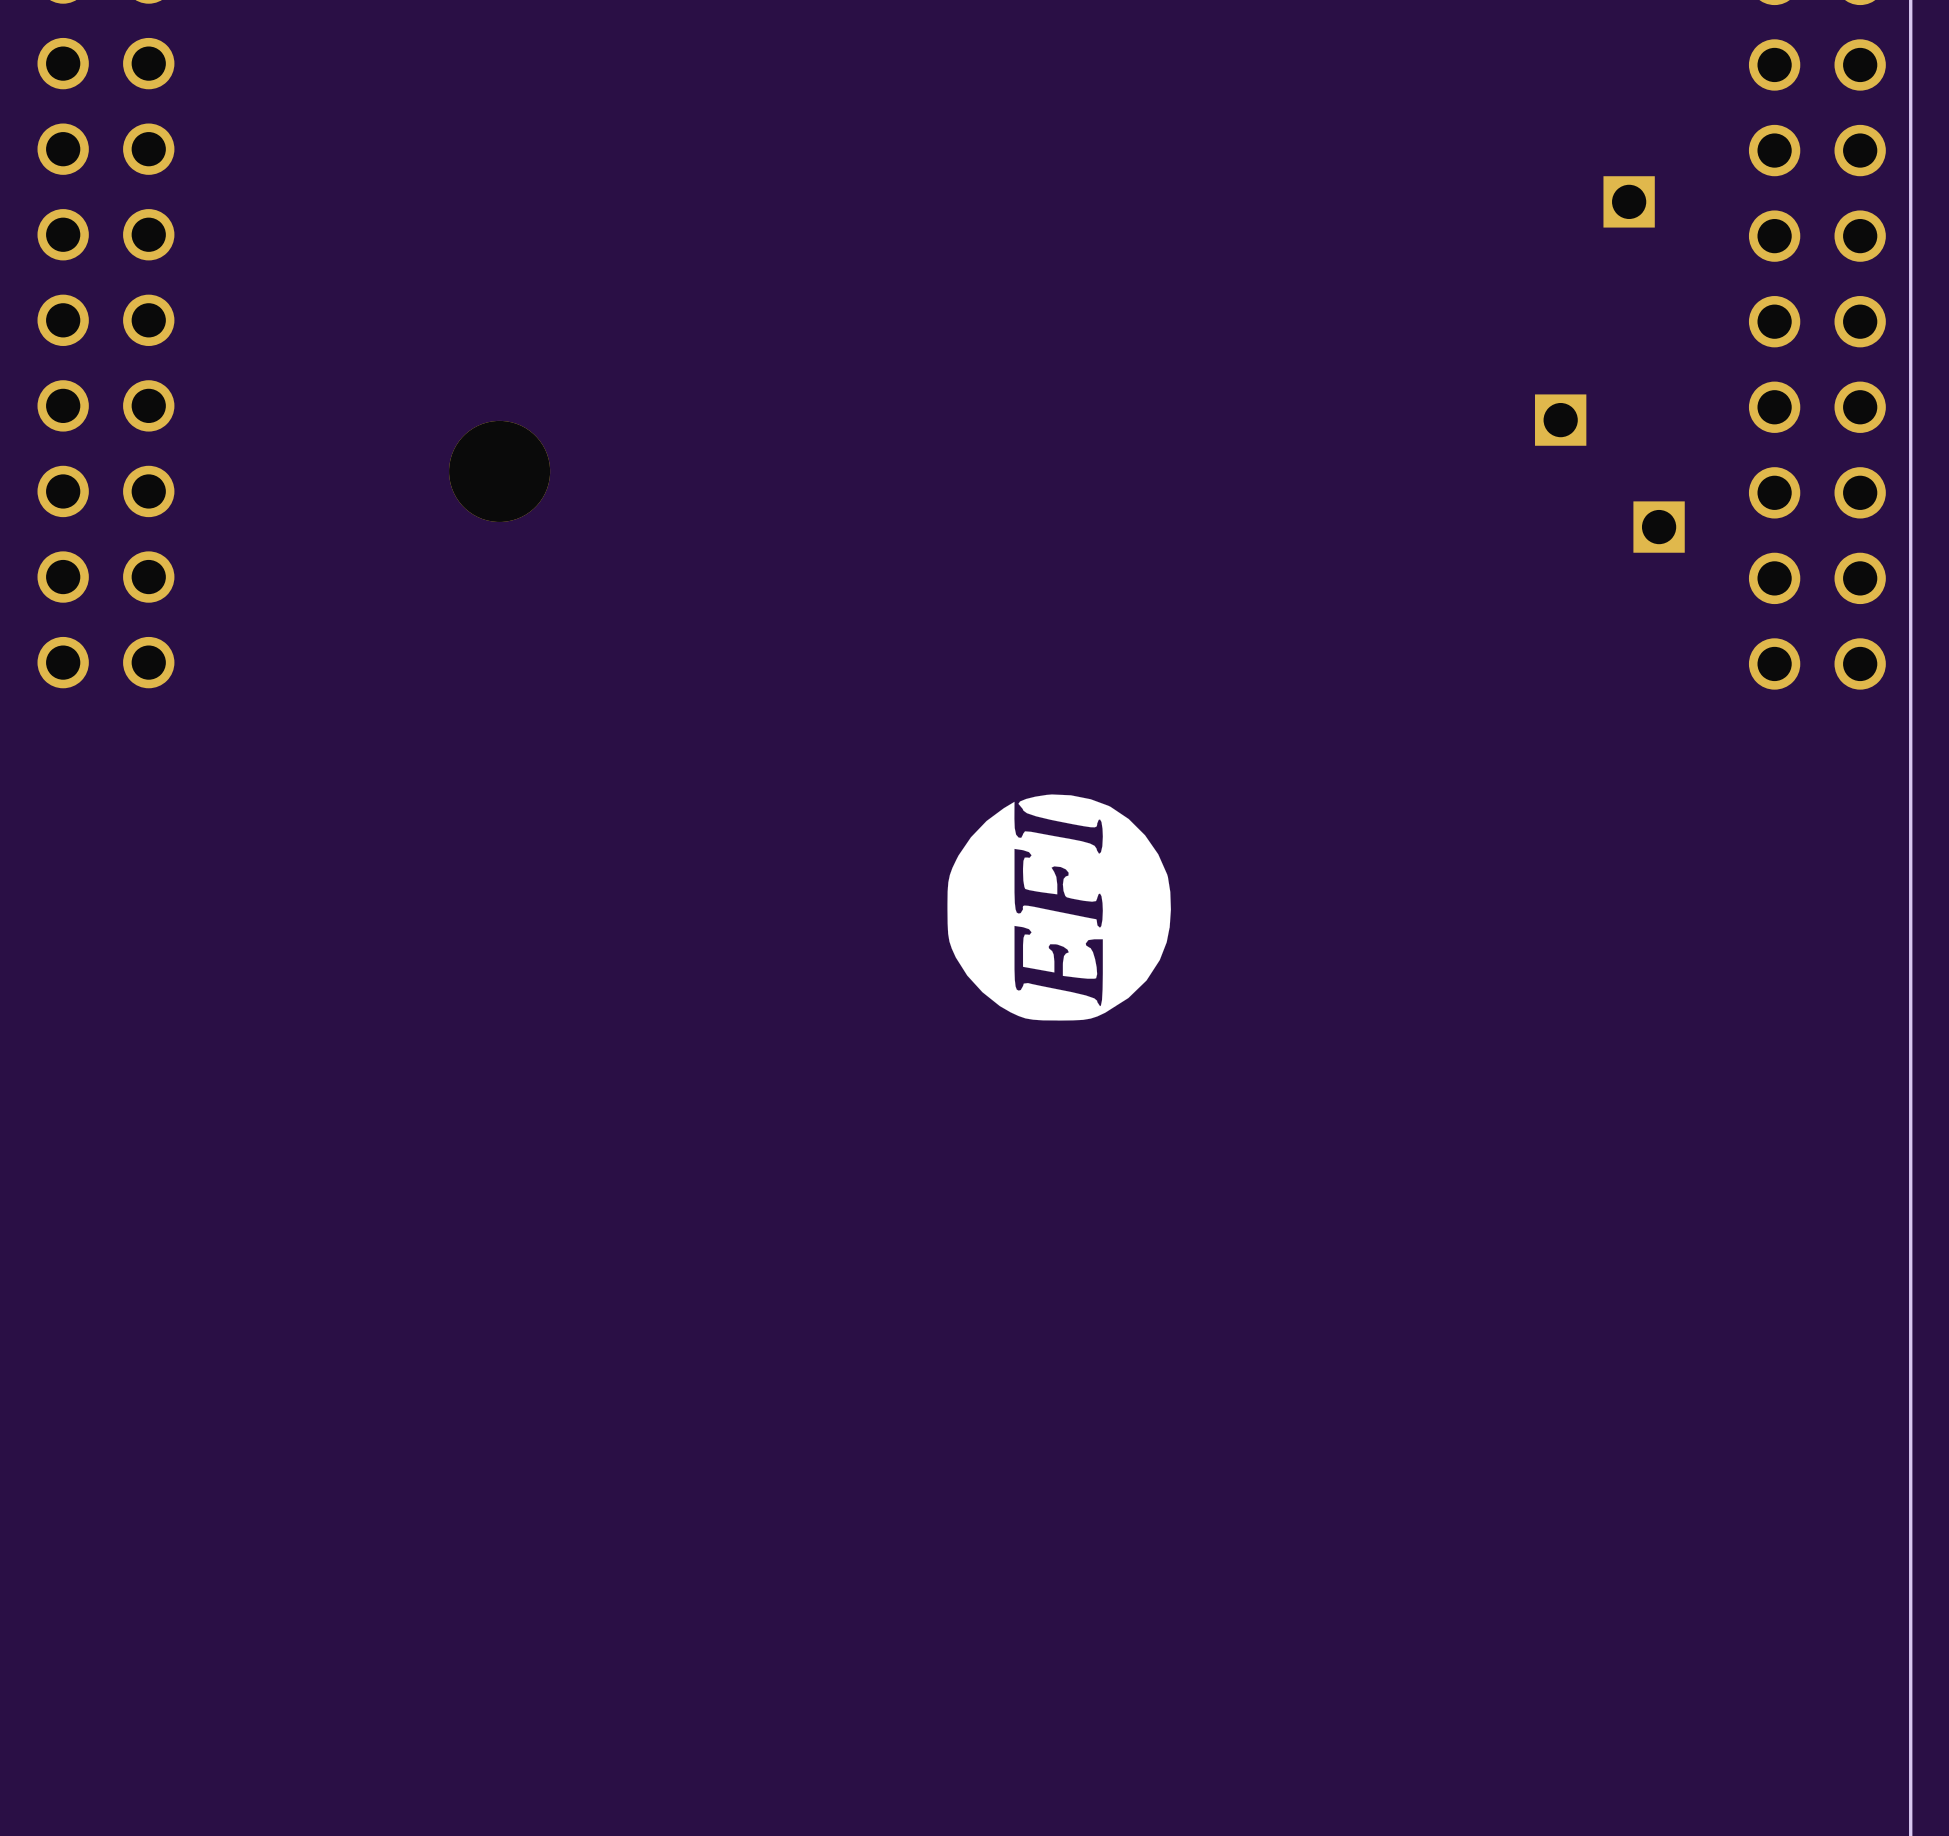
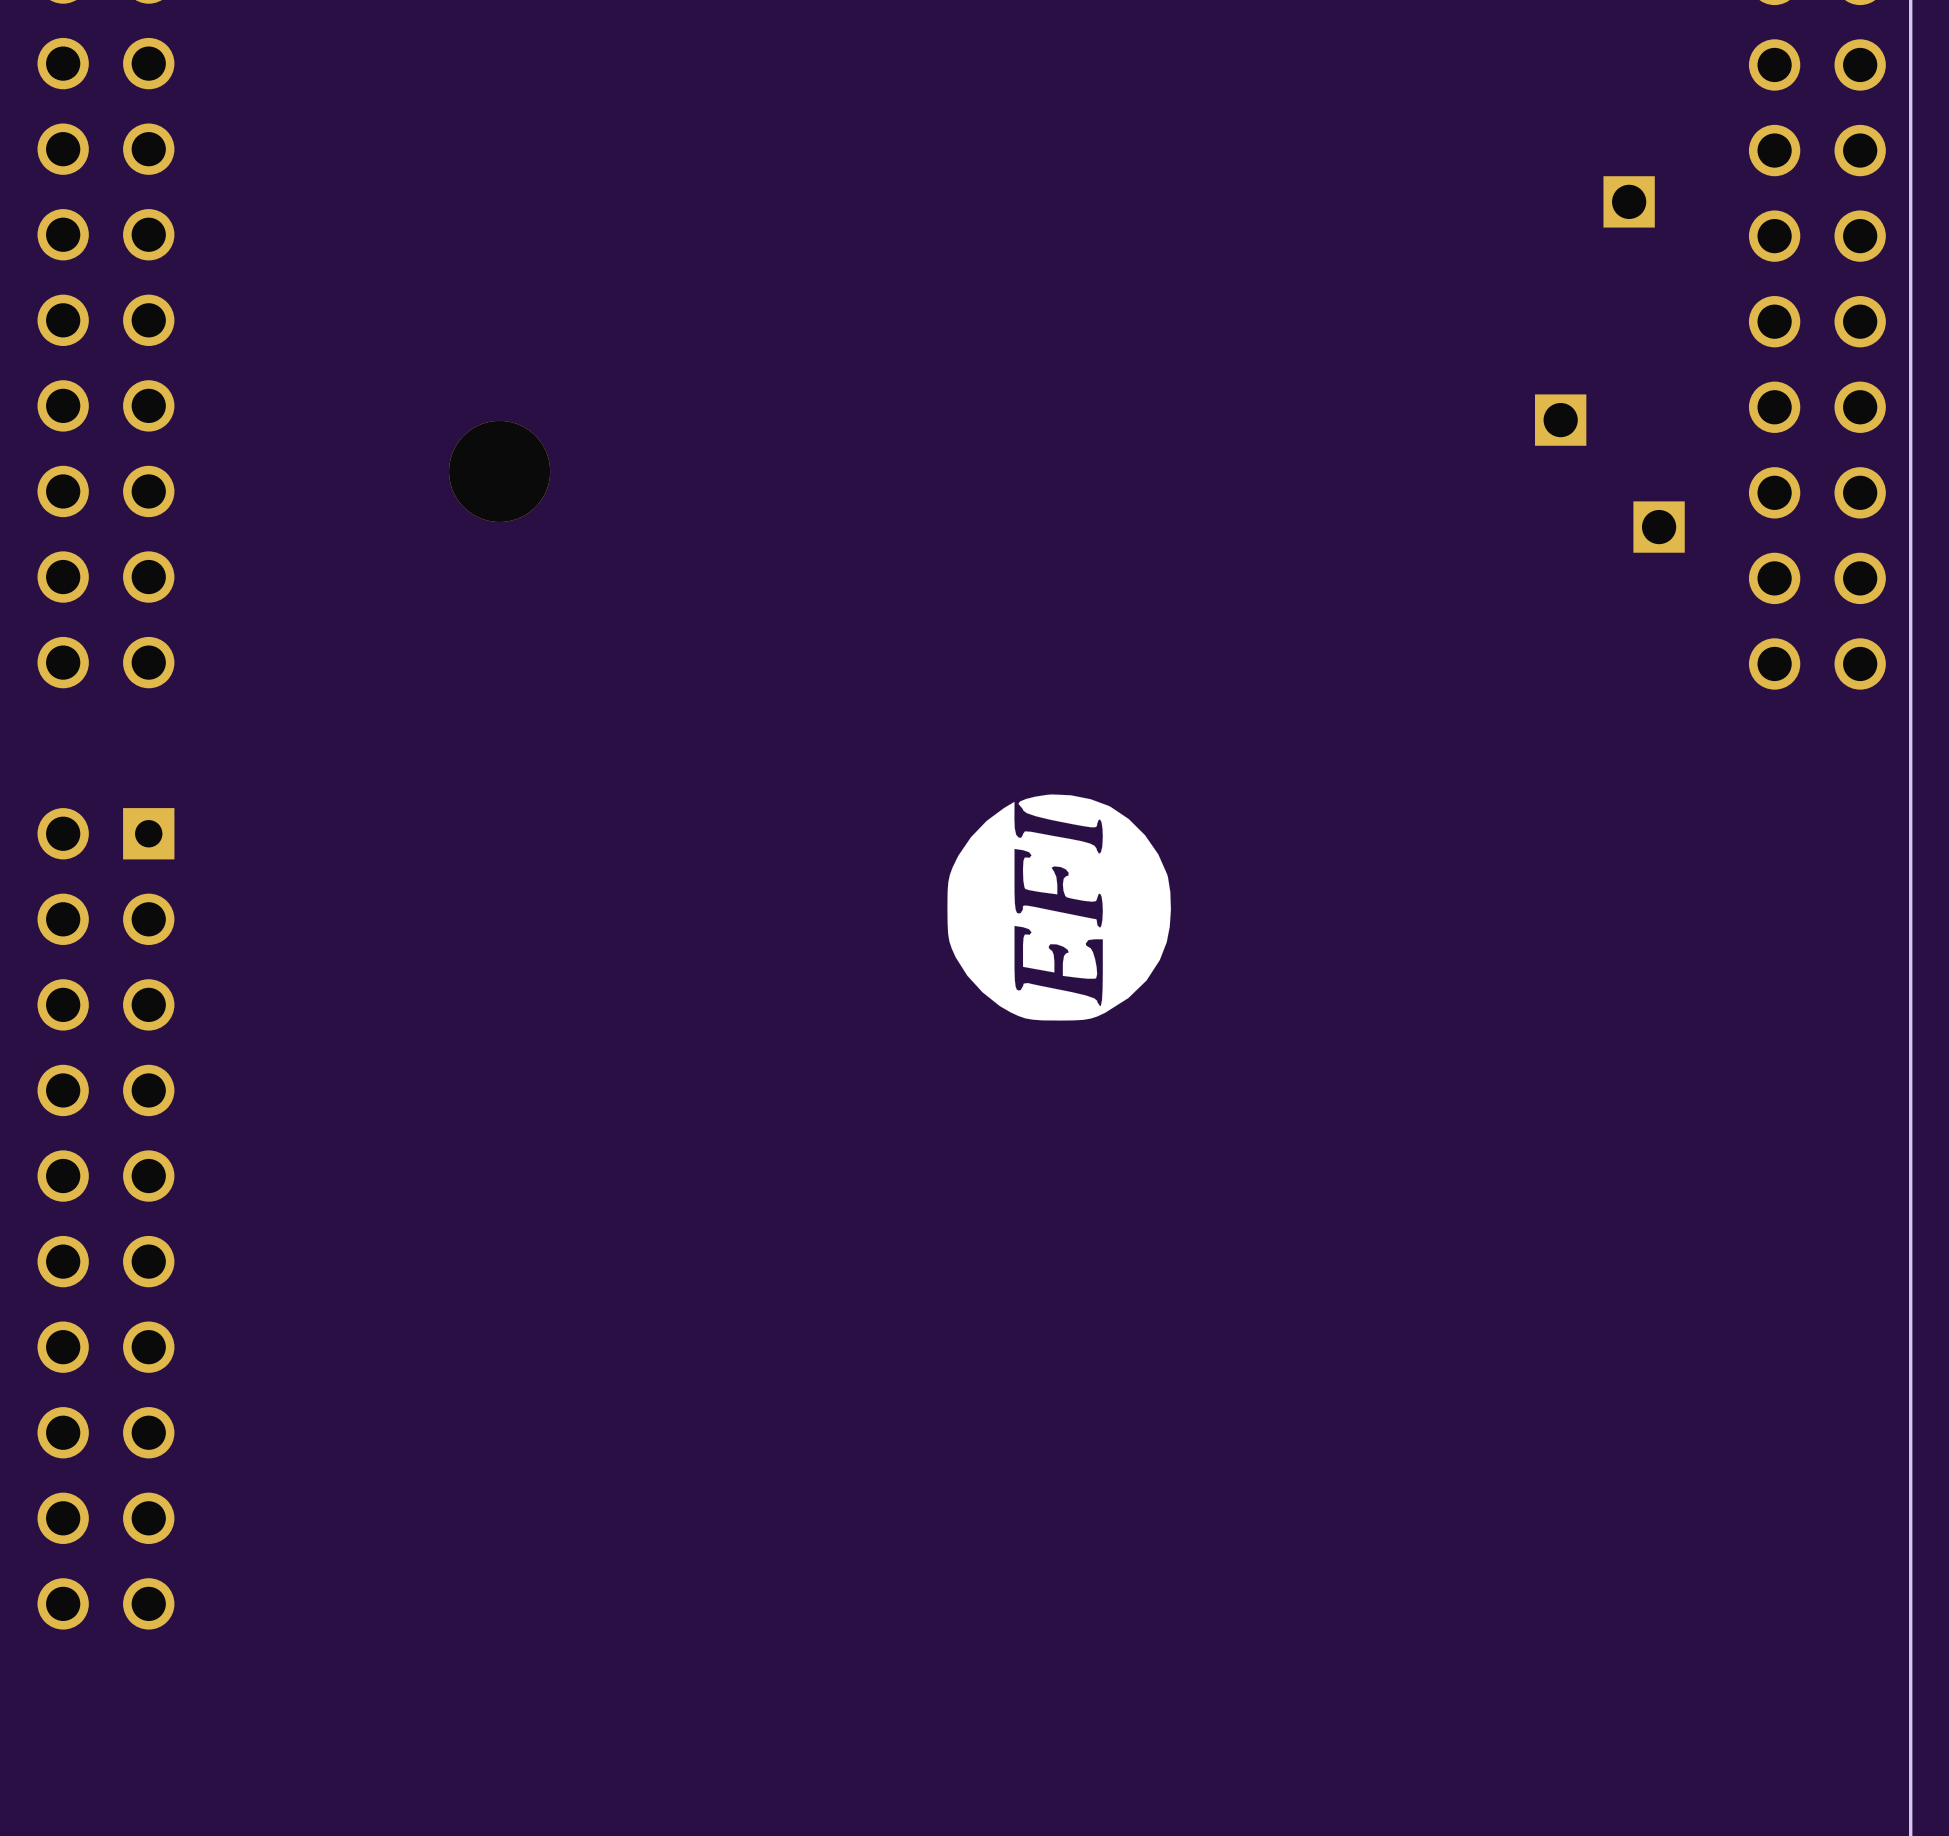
part: none -> (105, 1218)

